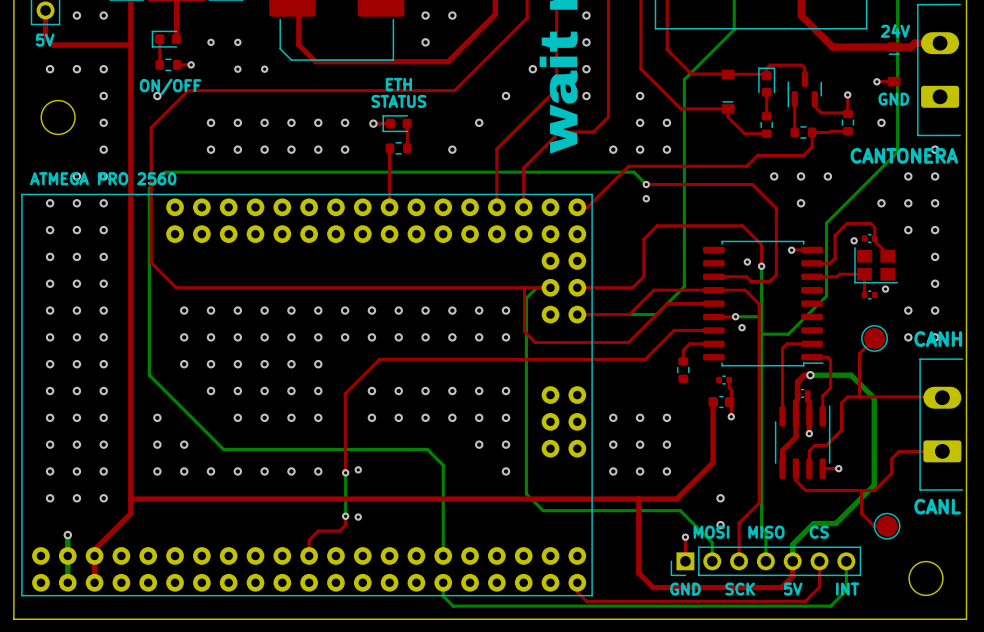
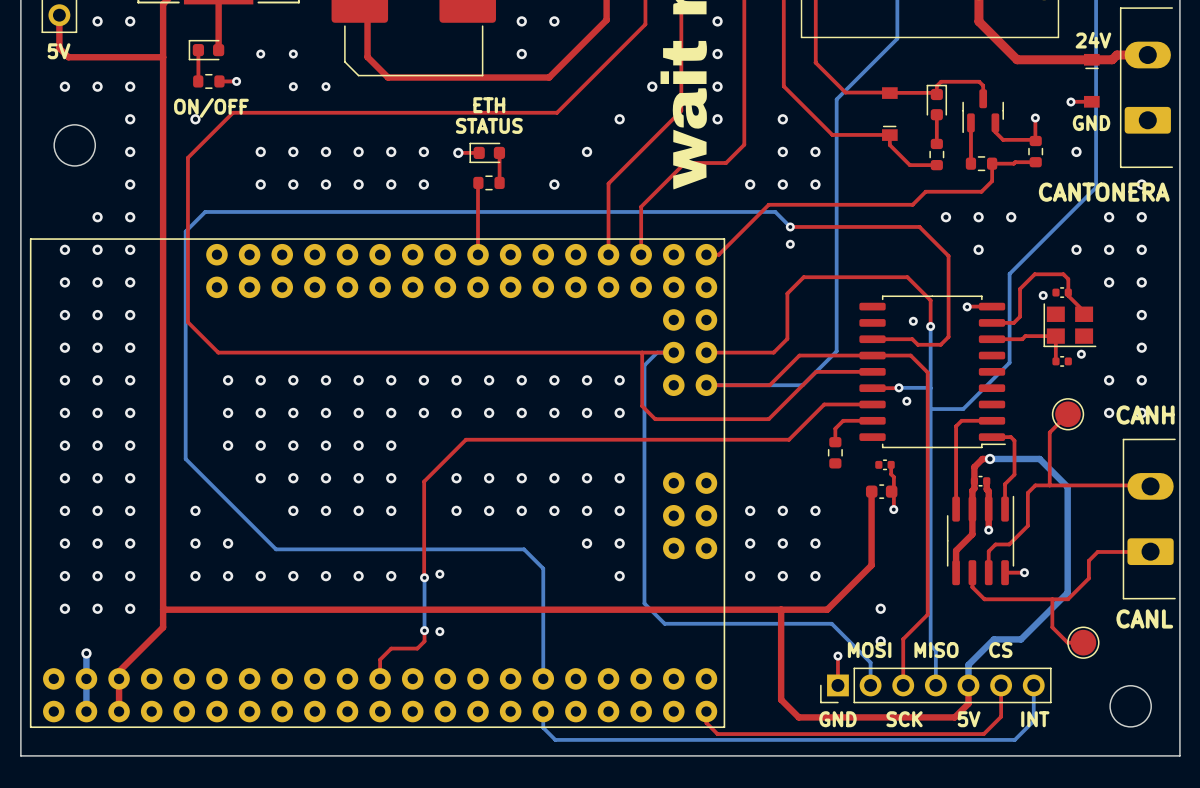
text: ATMEGA PRO 2560 (103, 178) -> none

